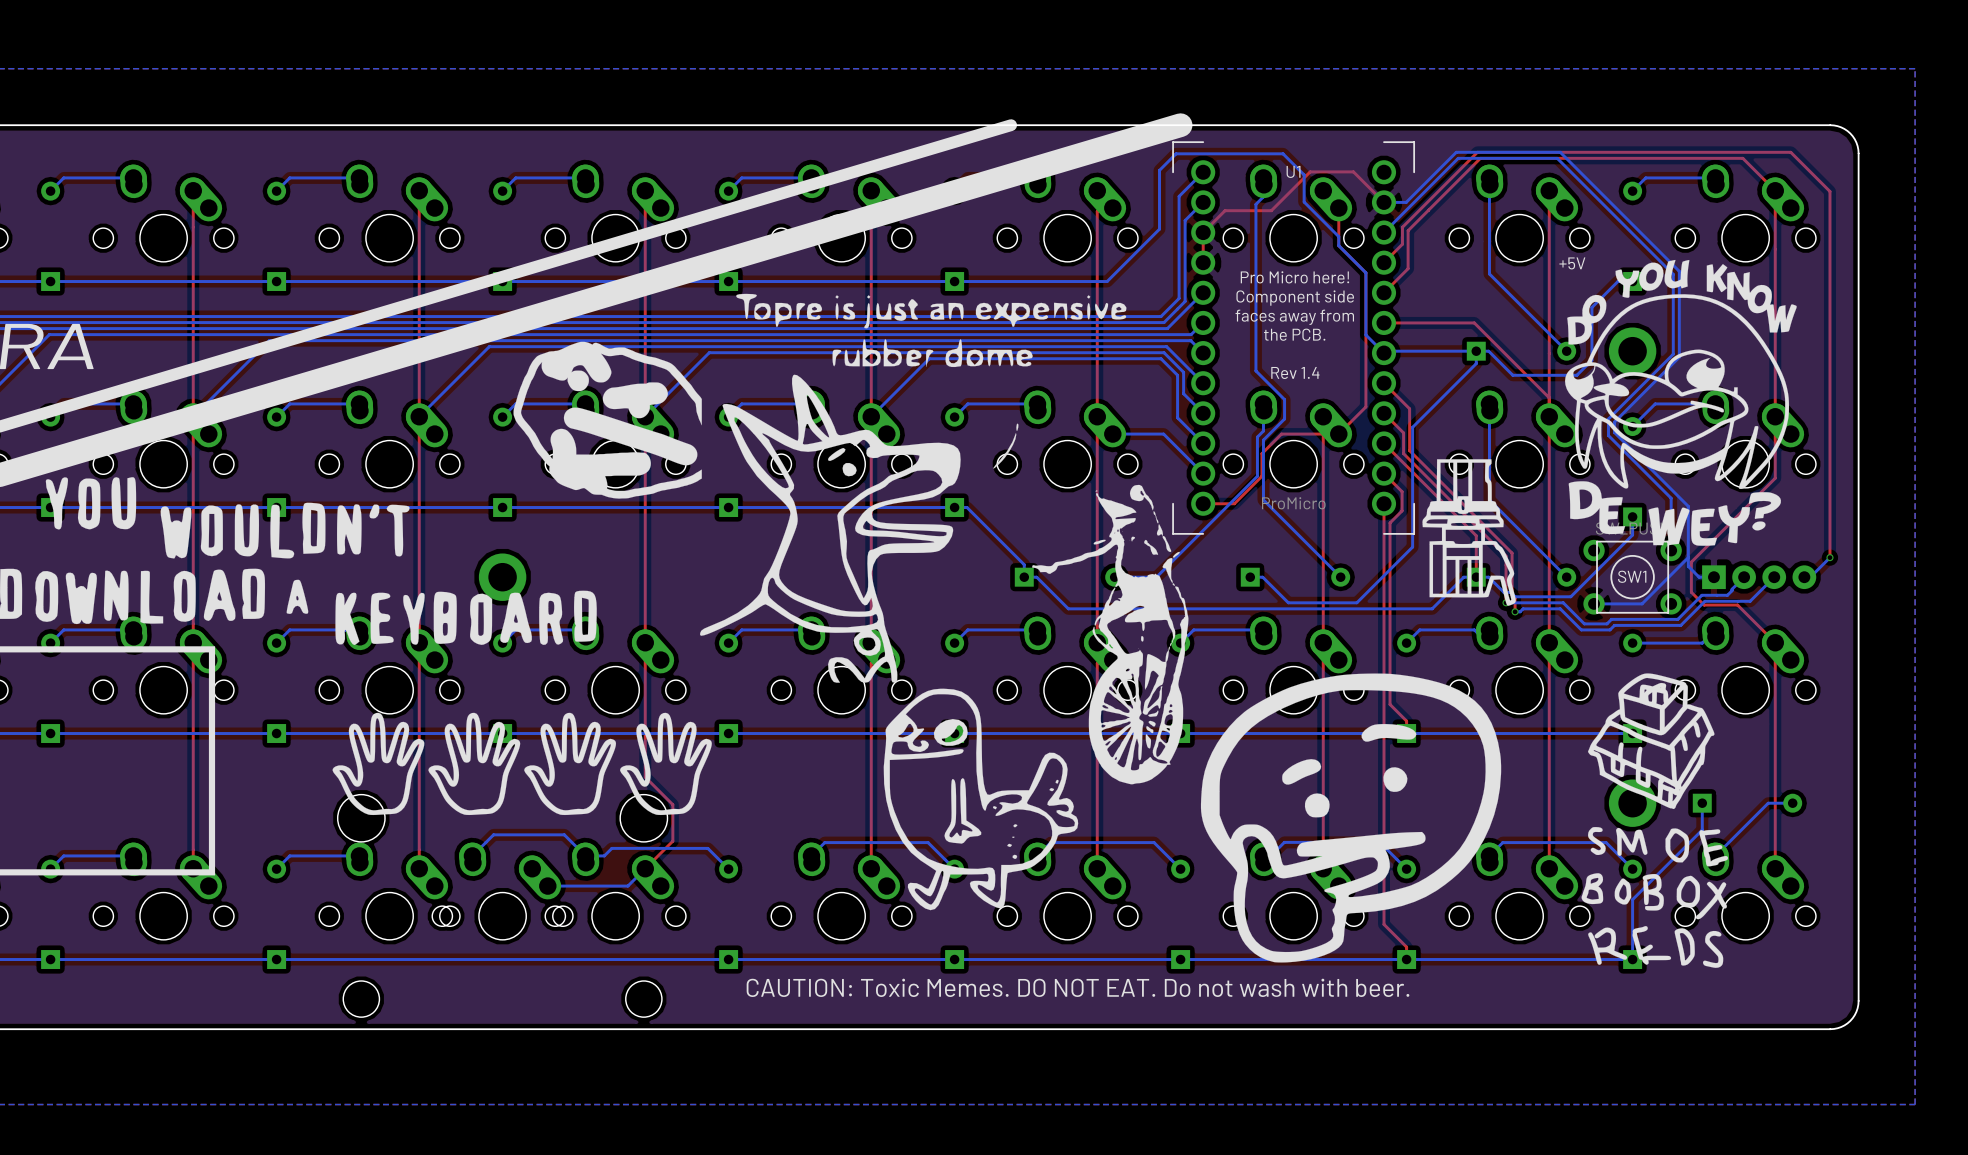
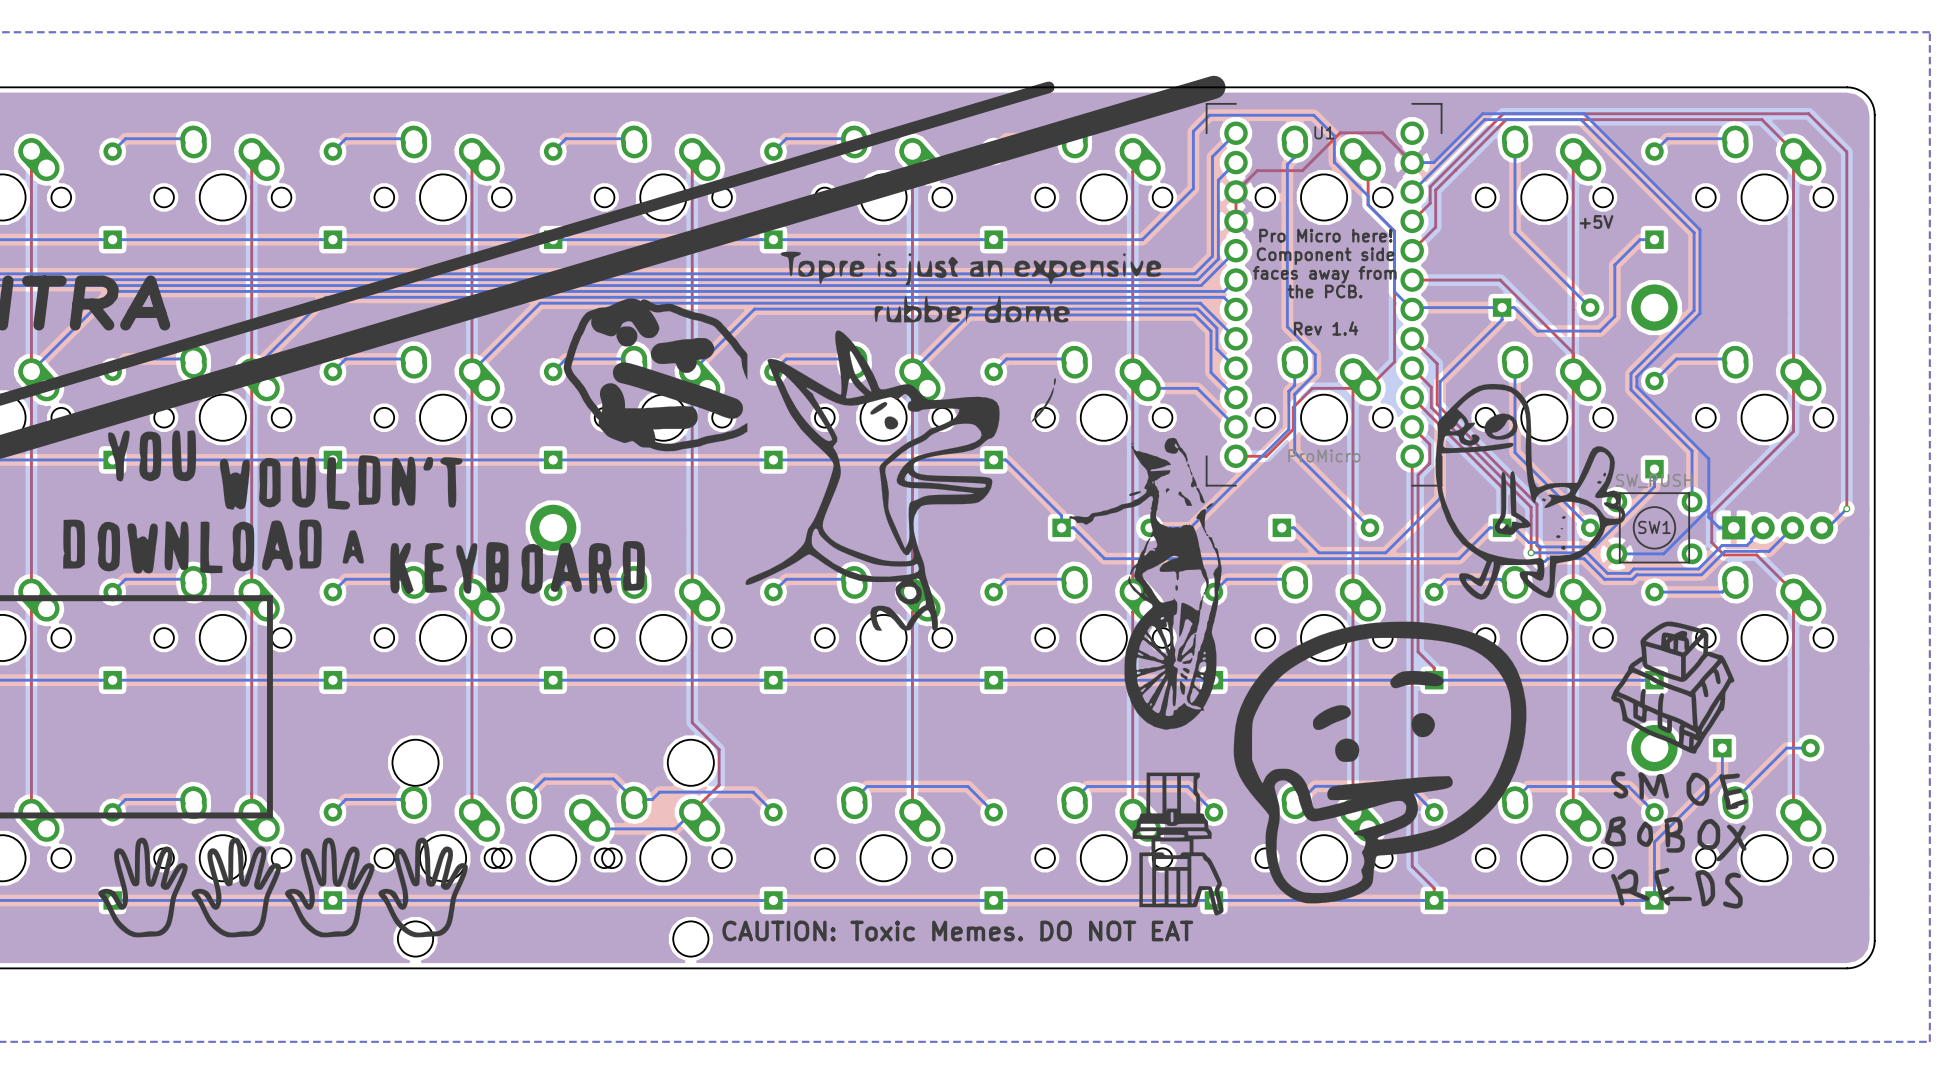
drawing: [1564, 259, 1797, 546] -> none
drawing: none -> [1435, 383, 1626, 600]
drawing: [1422, 459, 1516, 606] -> none
drawing: [883, 688, 1079, 911] -> none
drawing: [332, 712, 712, 816] -> none
drawing: none -> [1132, 772, 1224, 916]
drawing: none -> [98, 837, 468, 938]
text: CAUTION: Toxic Memes. DO NOT EAT. Do not wash with beer. (1077, 987) -> CAUTION: Toxic Memes. DO NOT EAT (957, 931)

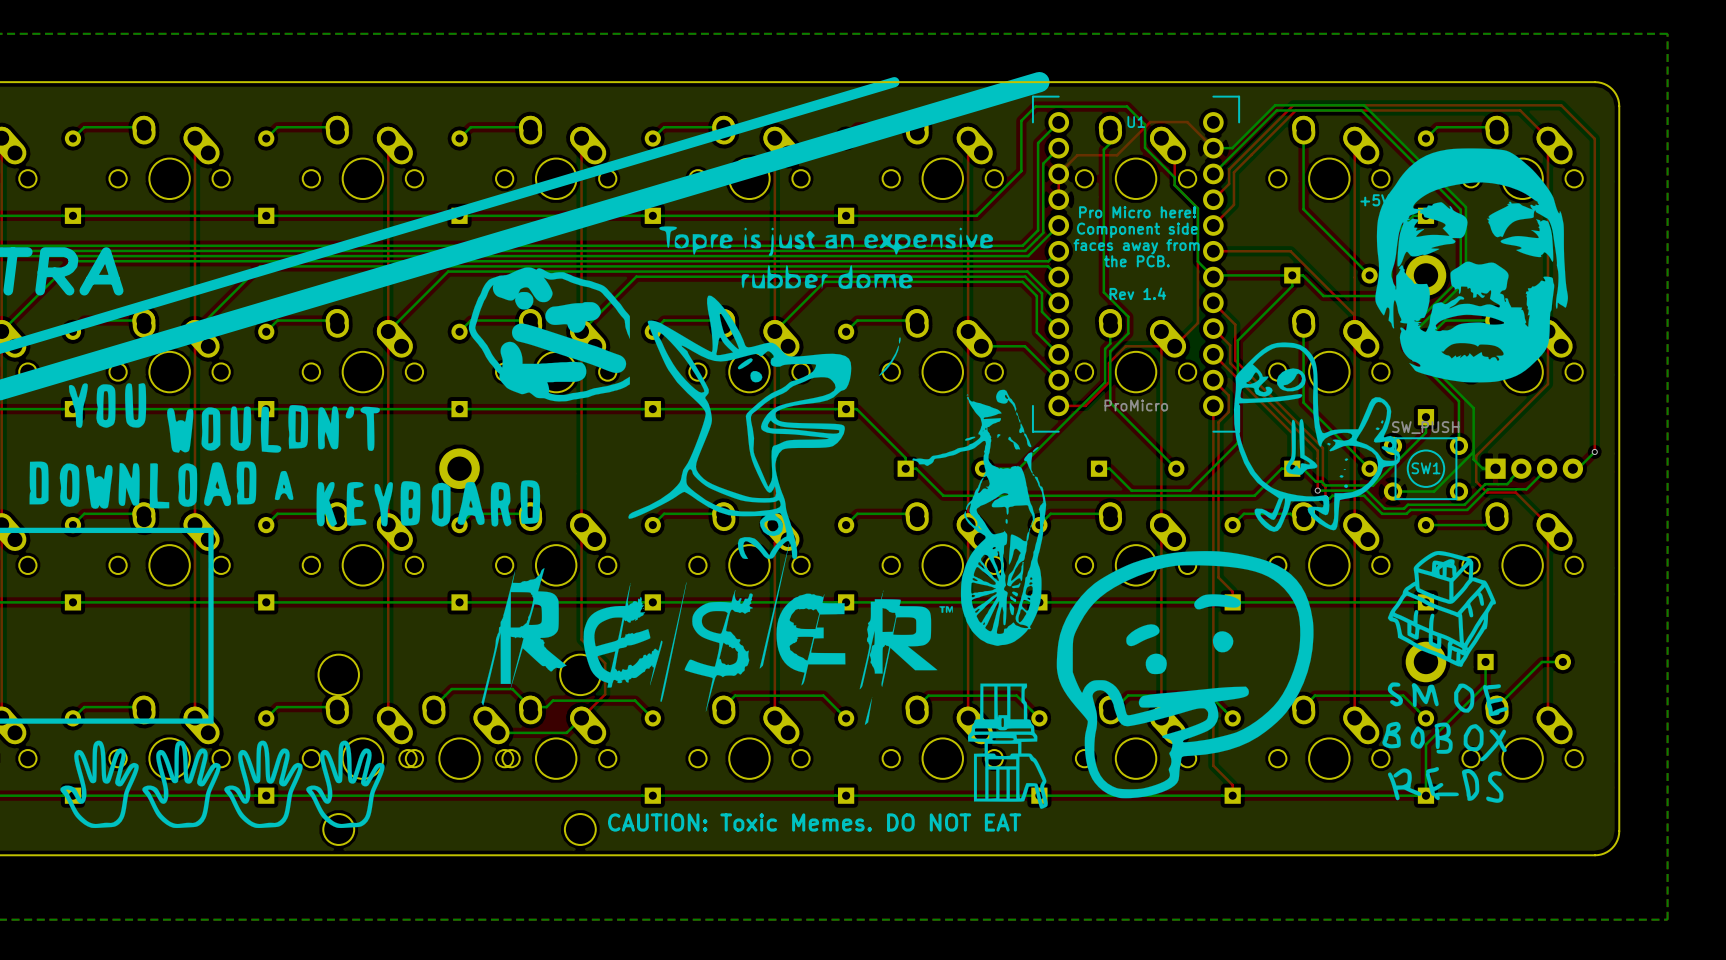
drawing: none -> [1375, 148, 1568, 383]
drawing: none -> [481, 538, 953, 725]

